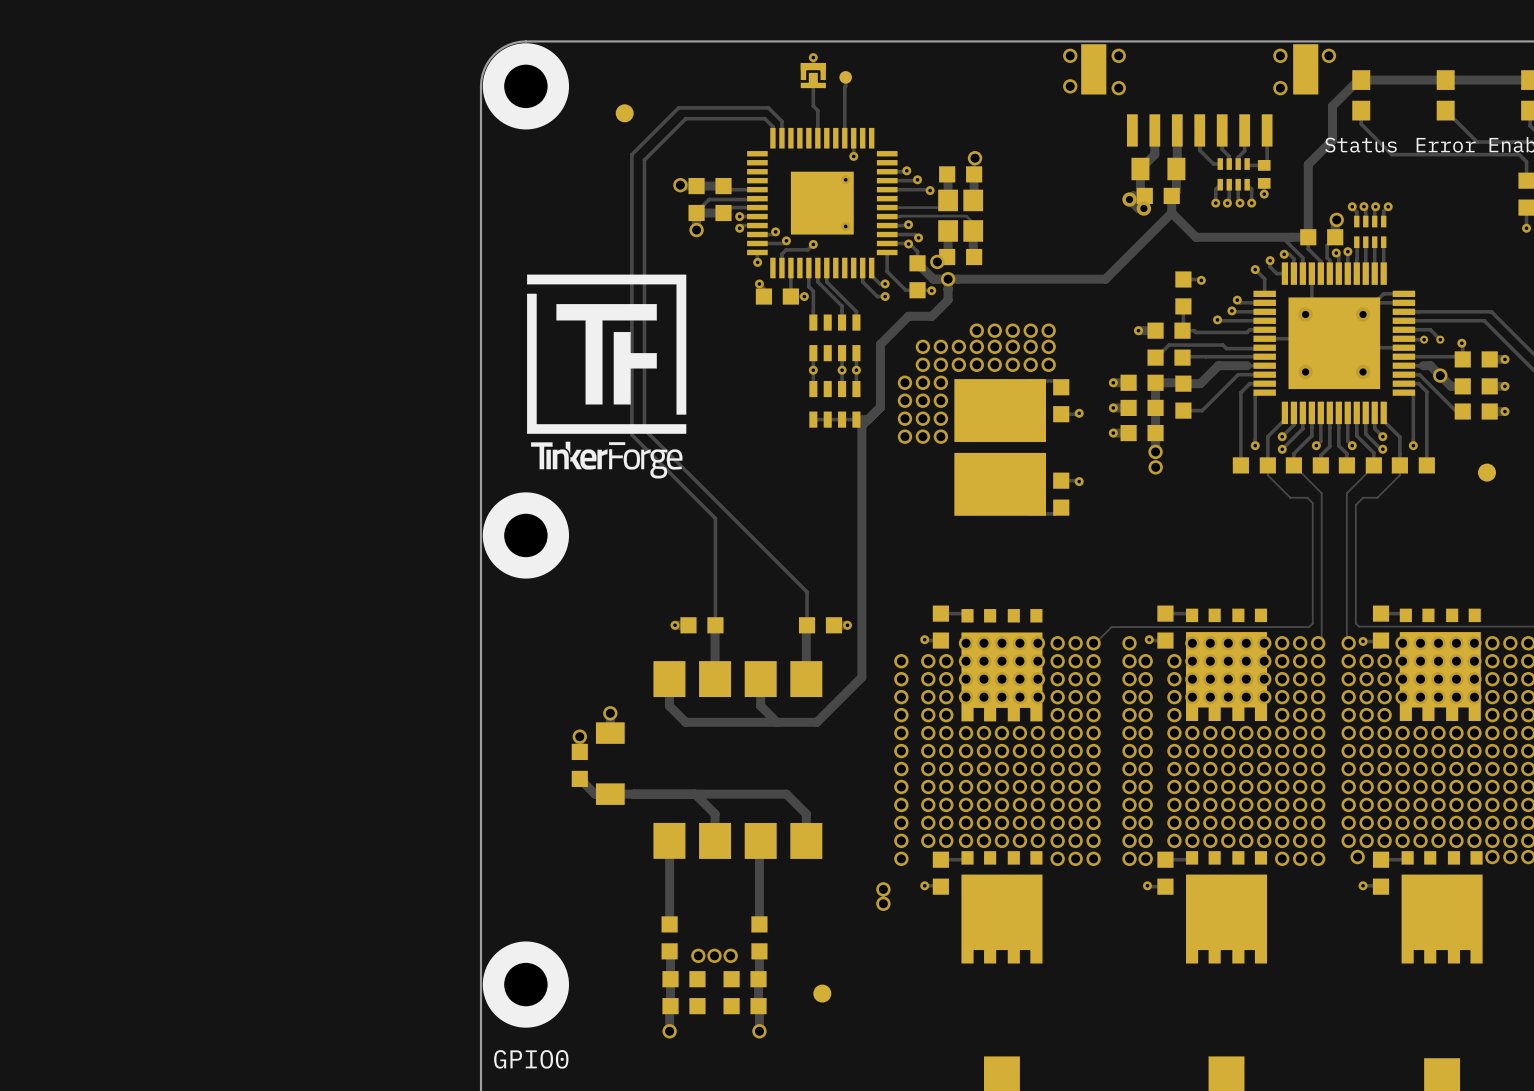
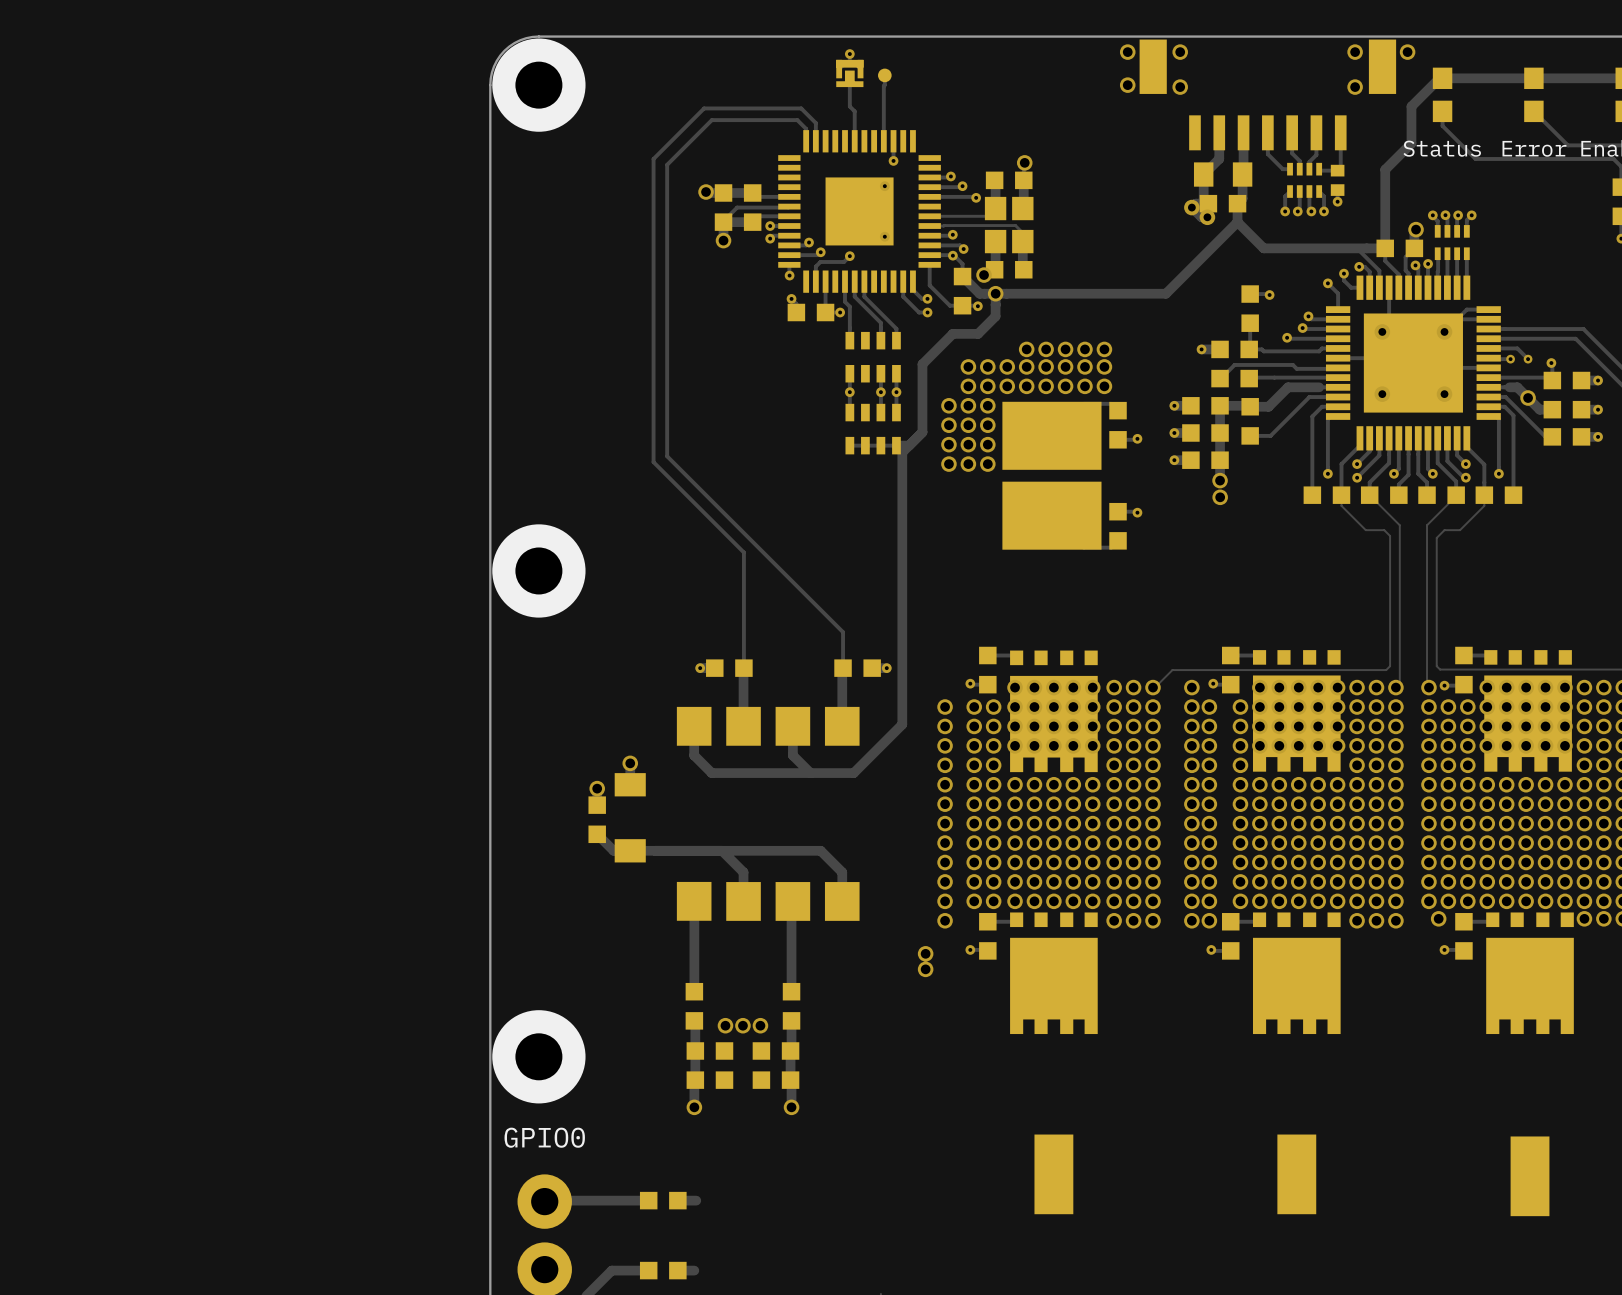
part: (624, 113) -> none
drawing: [527, 274, 687, 479] -> none
part: (1487, 472) -> none
part: (822, 993) -> none

